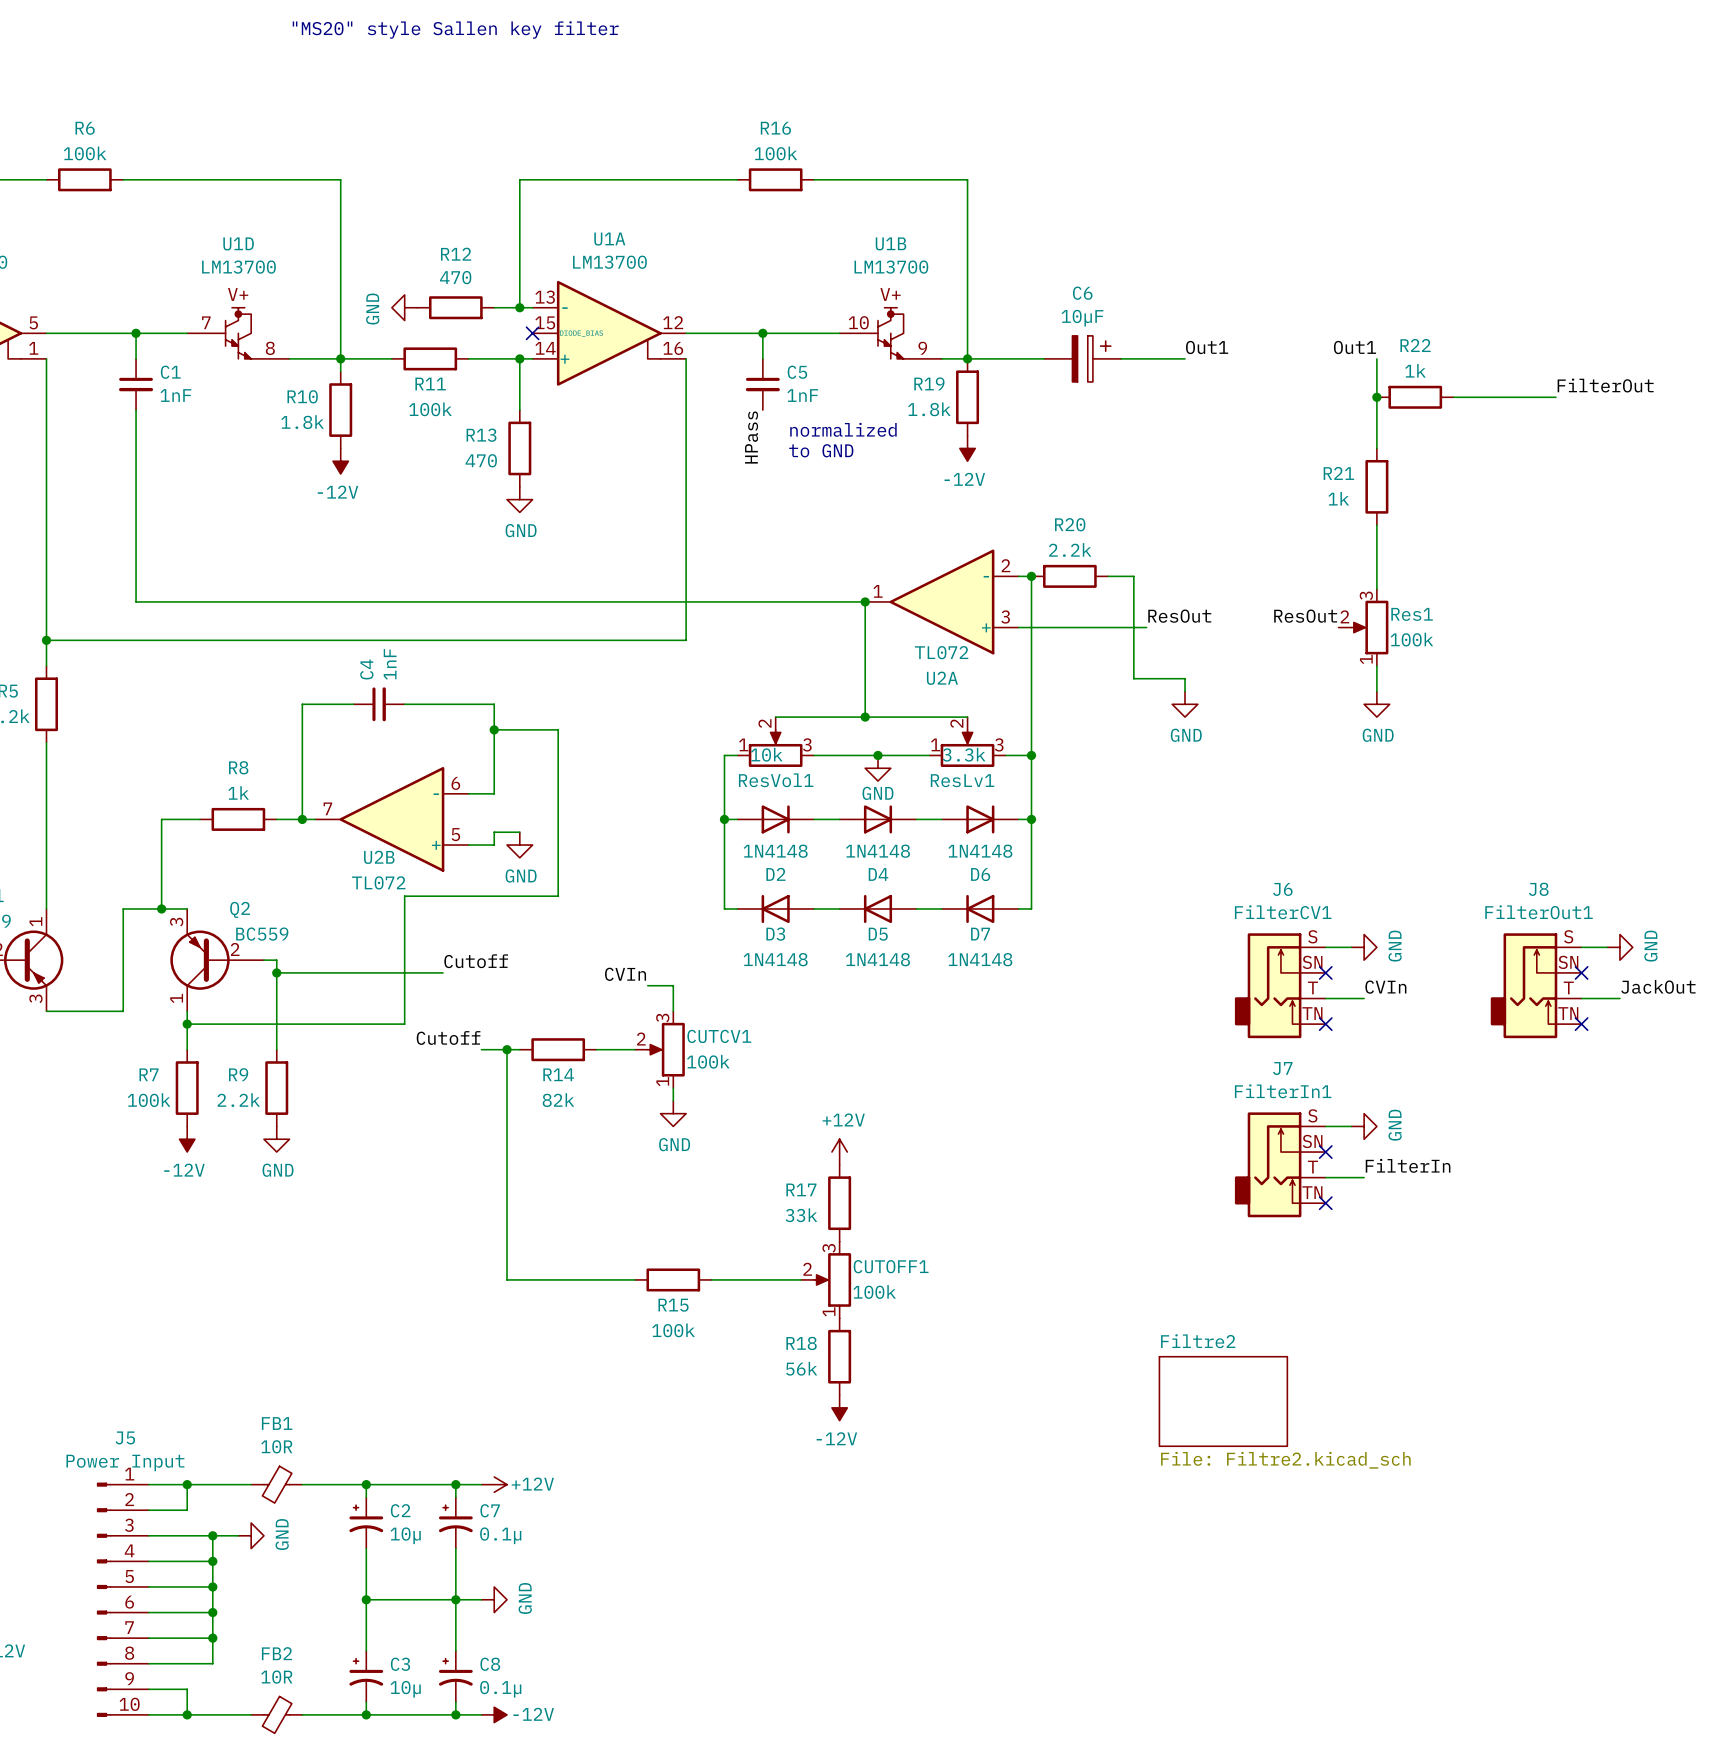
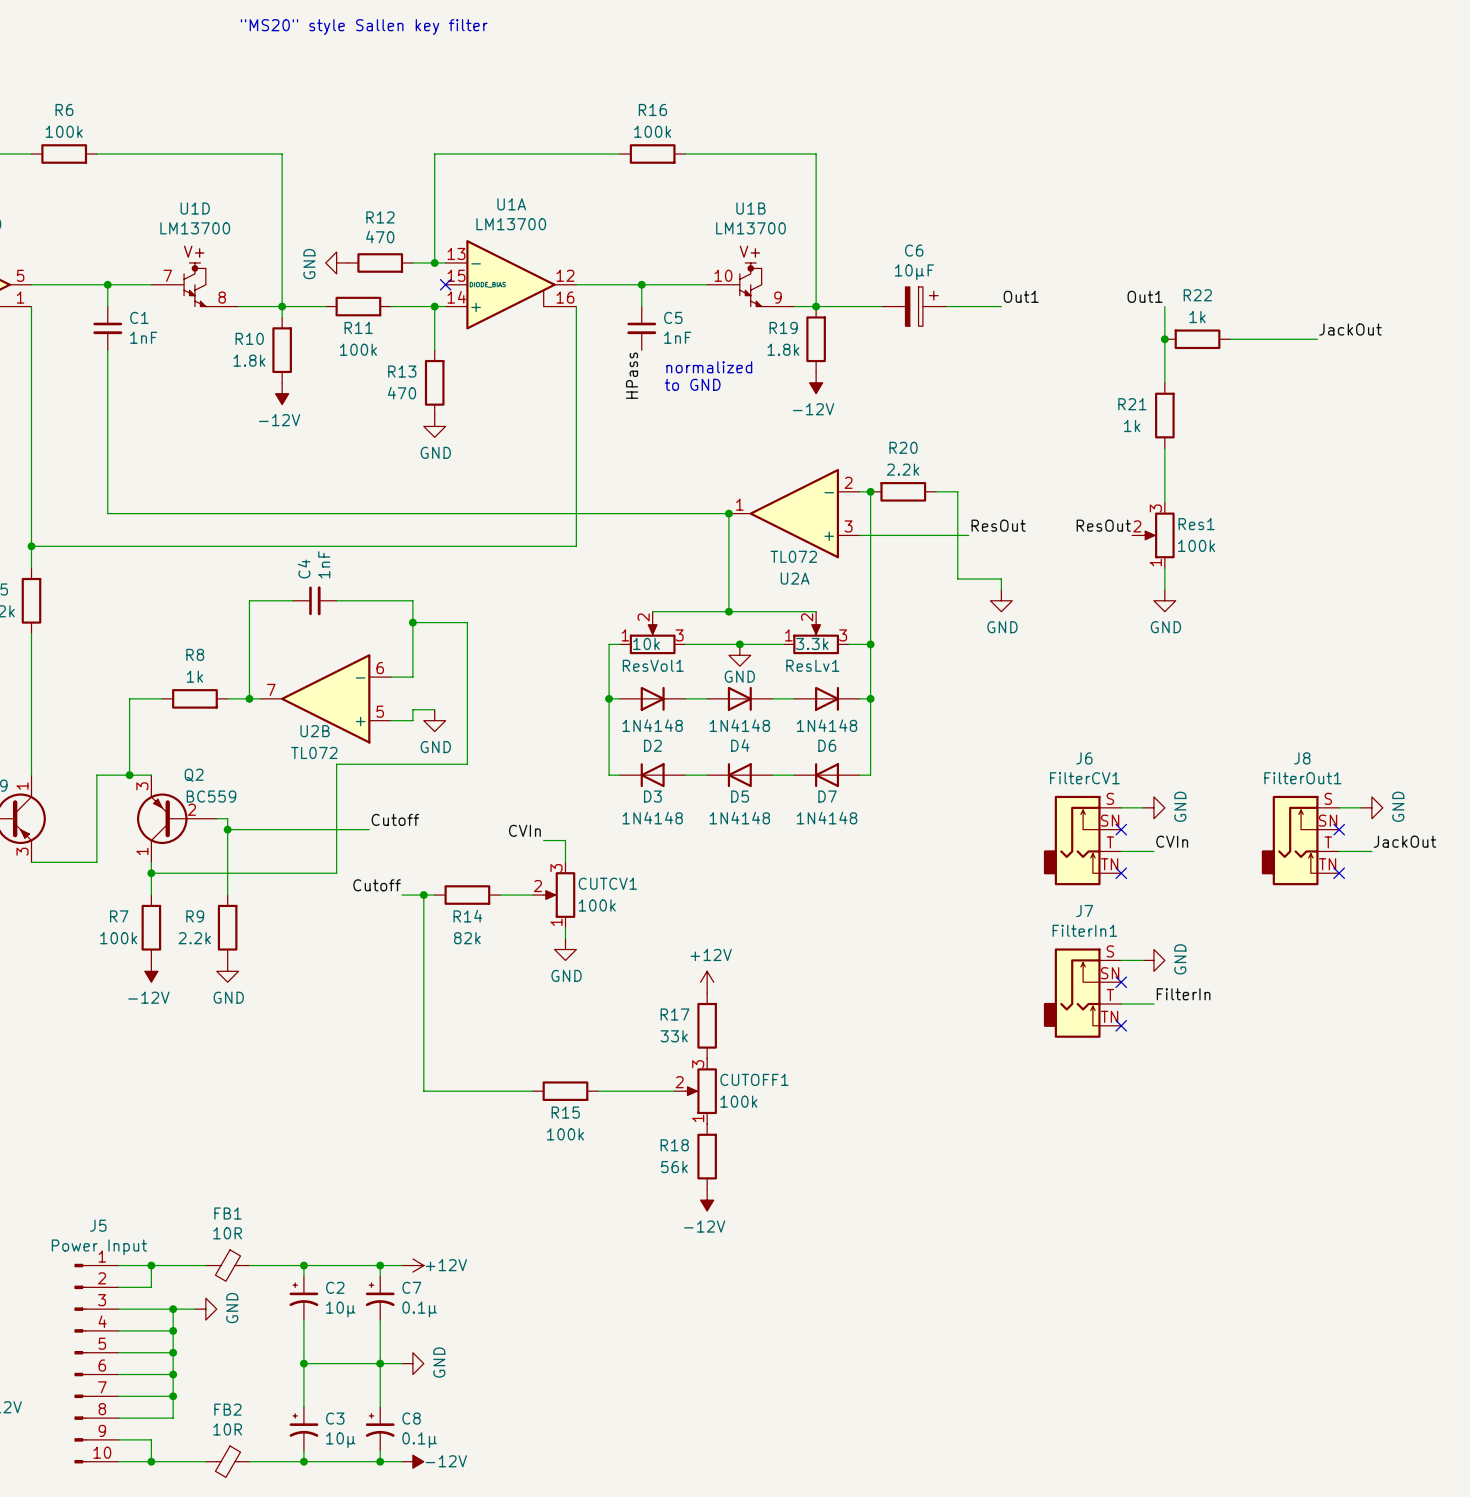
label: FilterOut (1605, 385) -> JackOut (1350, 329)
sheet Filtre2: File: Filtre2.kicad_sch (1223, 1401) -> none

